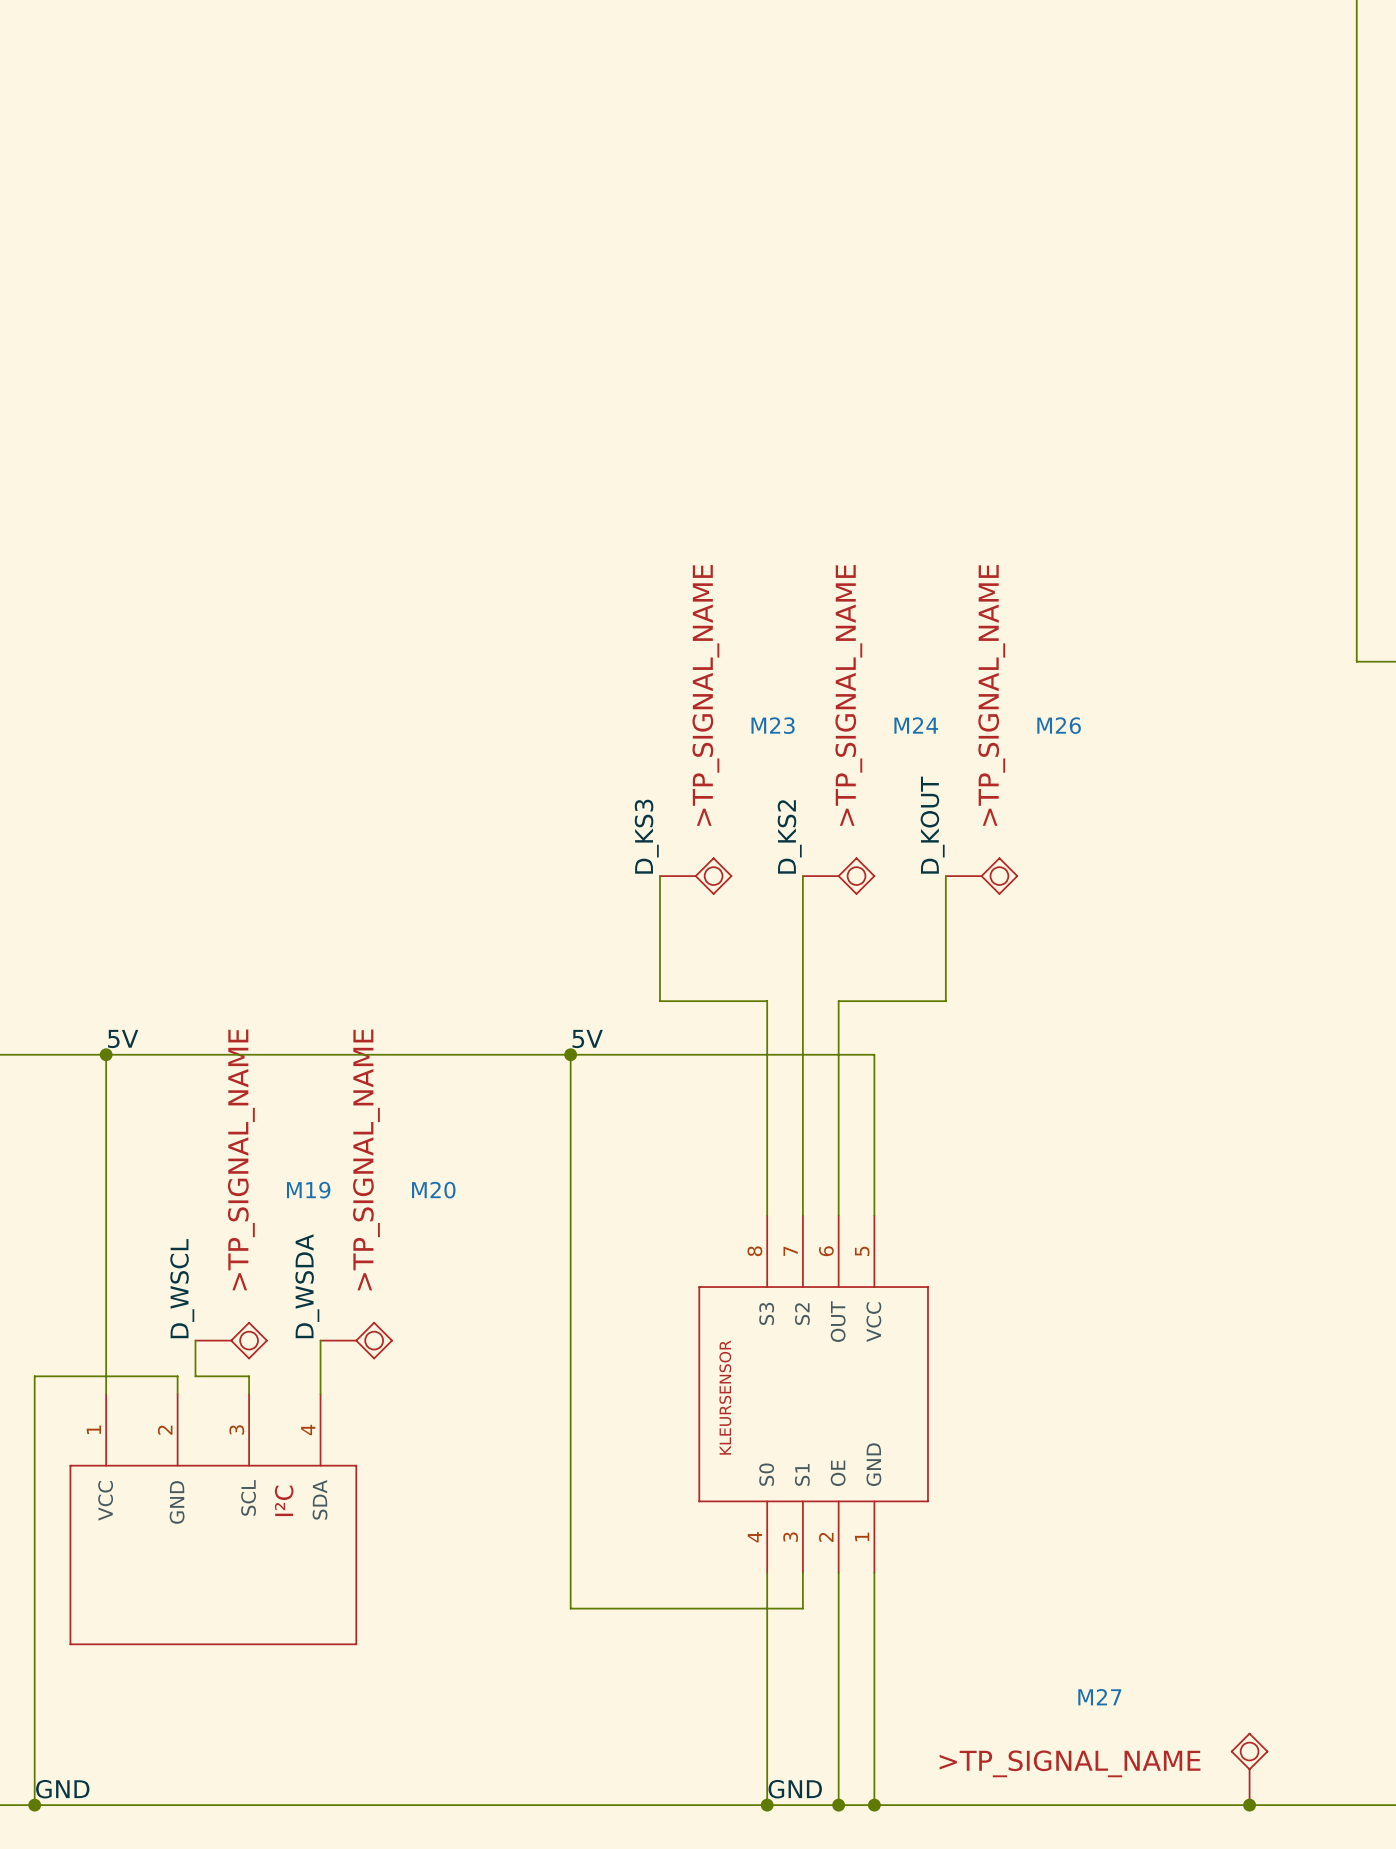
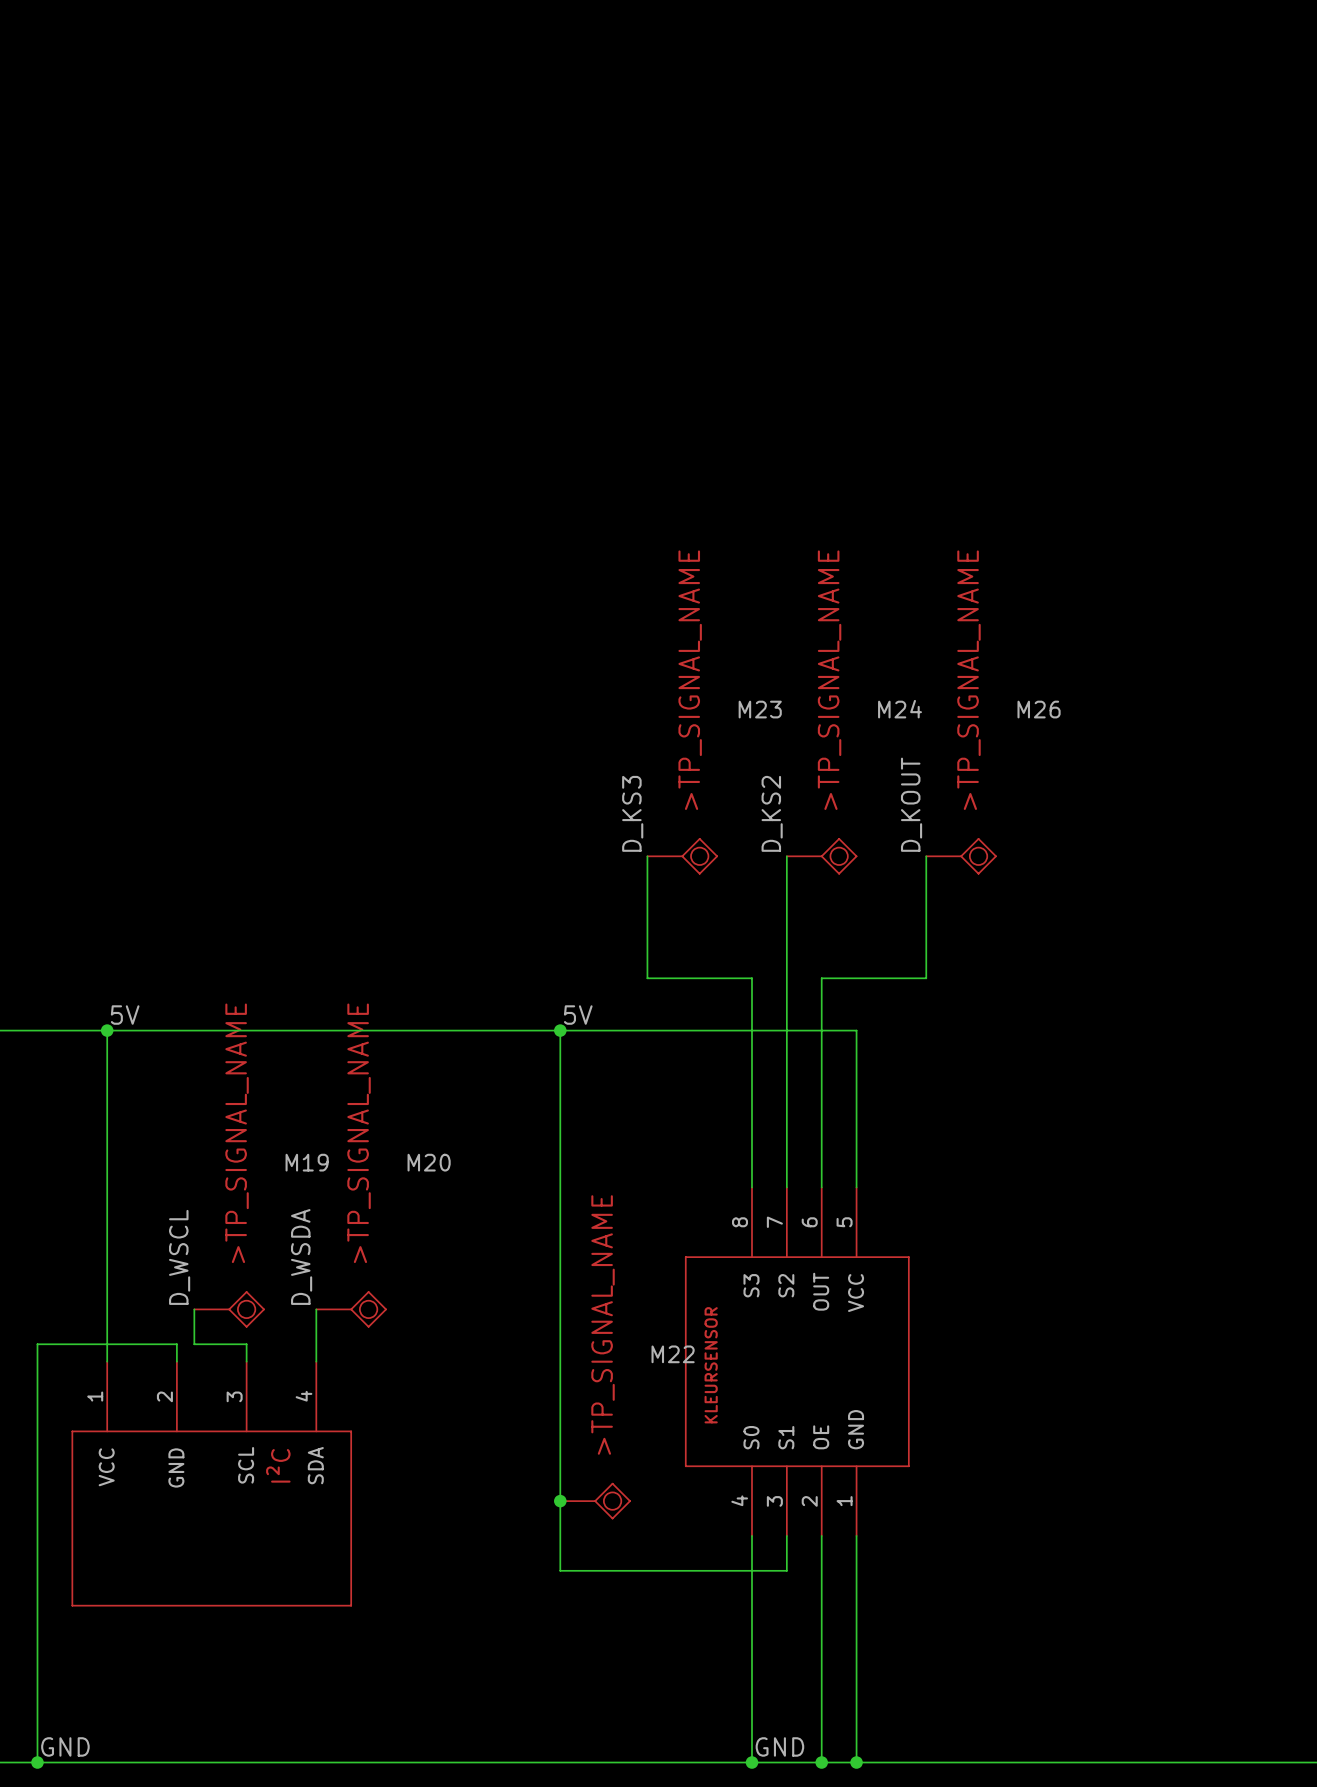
junction: none -> (560, 1501)
M22: none -> (595, 1501)
M27: (1249, 1769) -> none
junction: (1249, 1805) -> none

